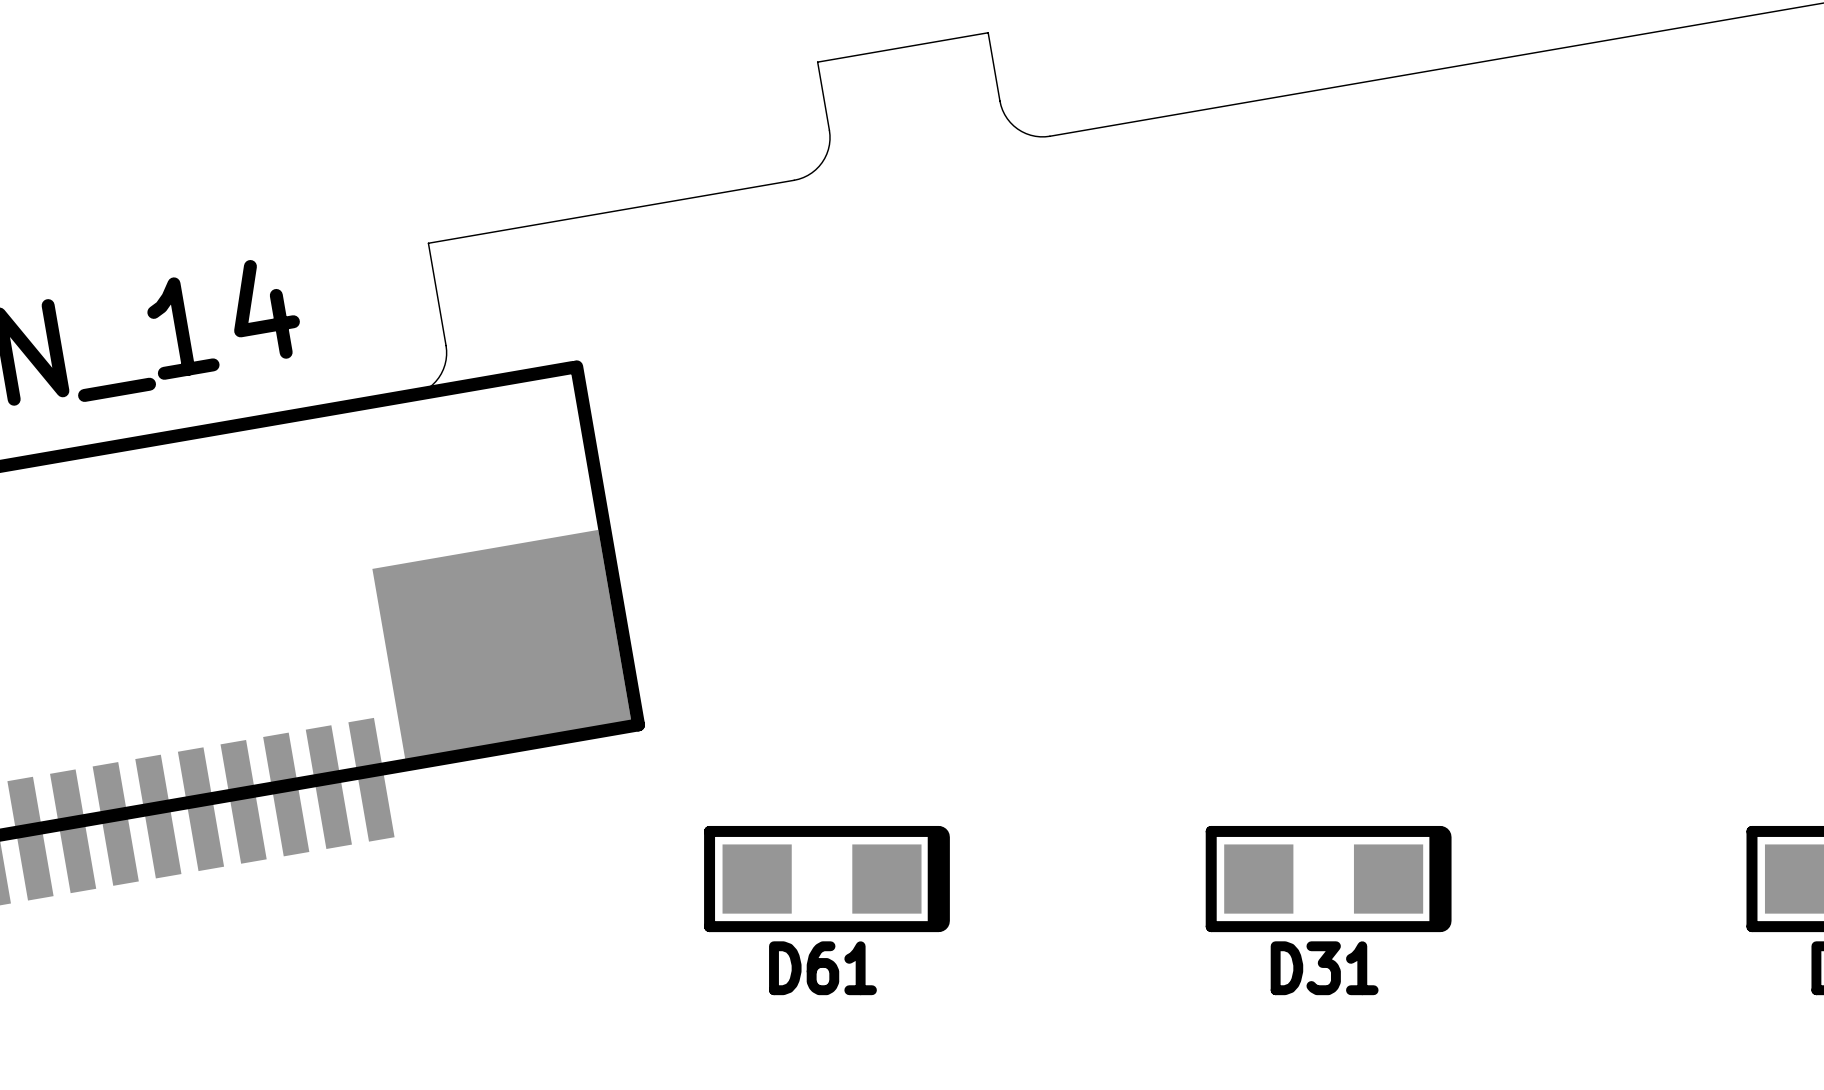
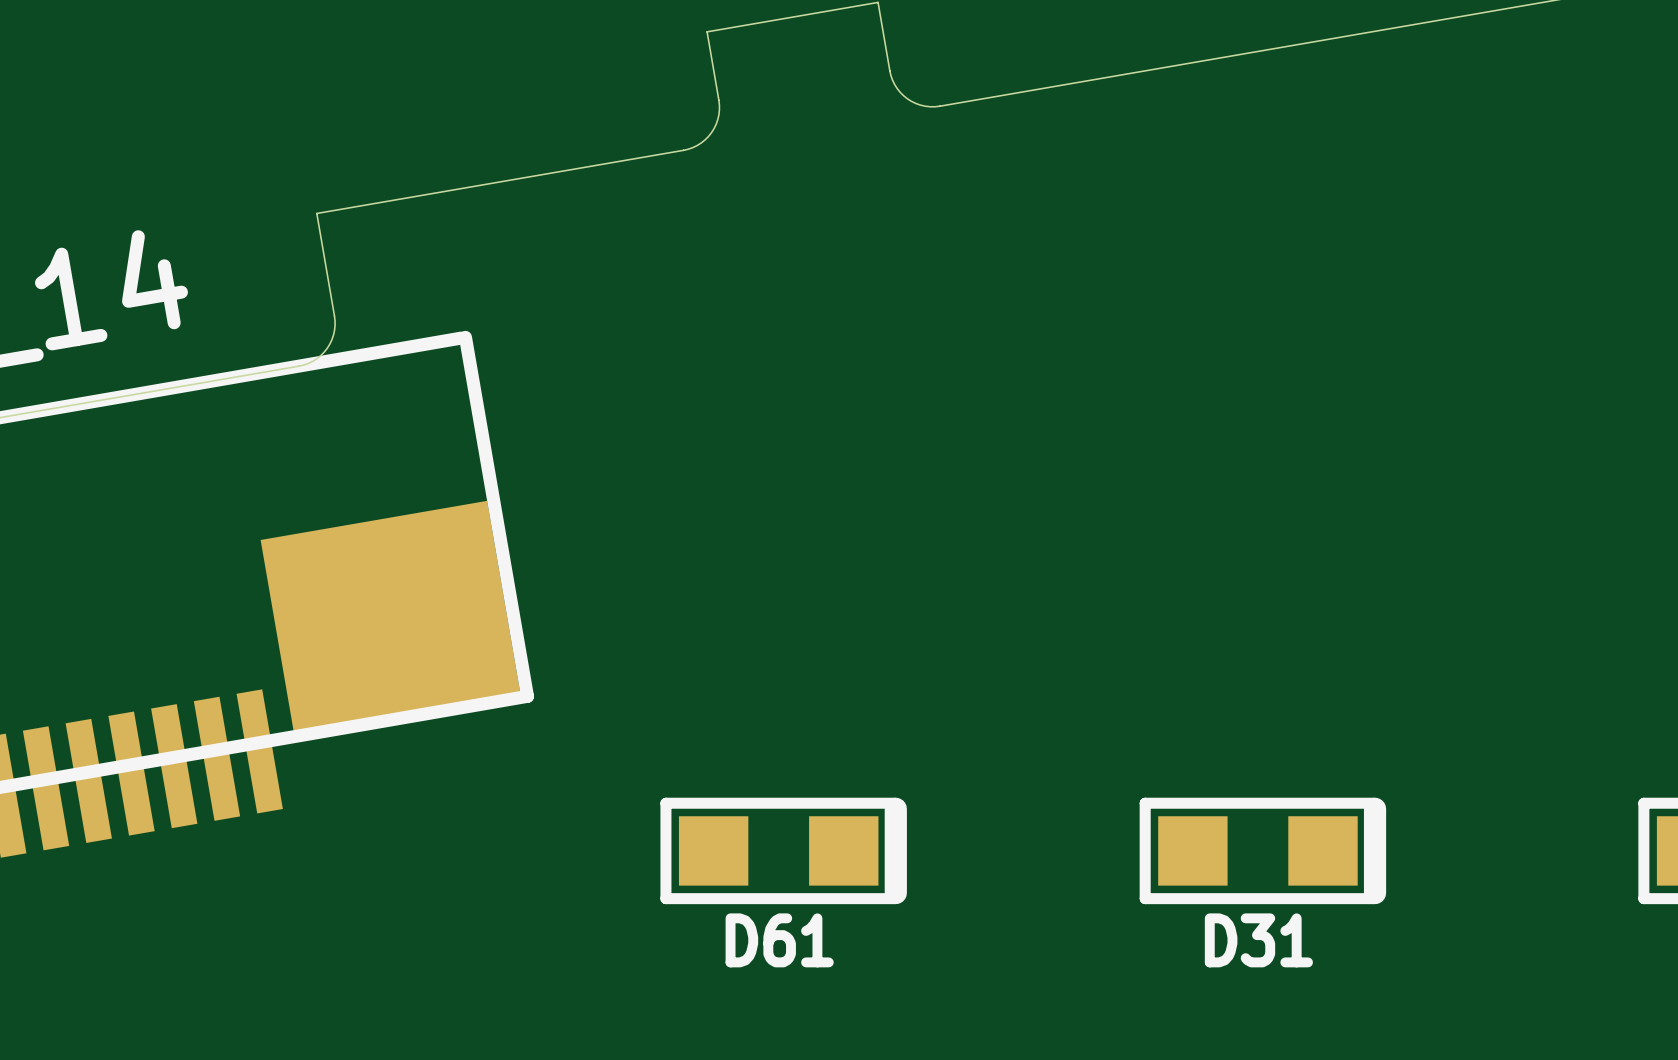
D61 position: (826, 879) -> (783, 850)
D31 position: (1328, 879) -> (1262, 850)

